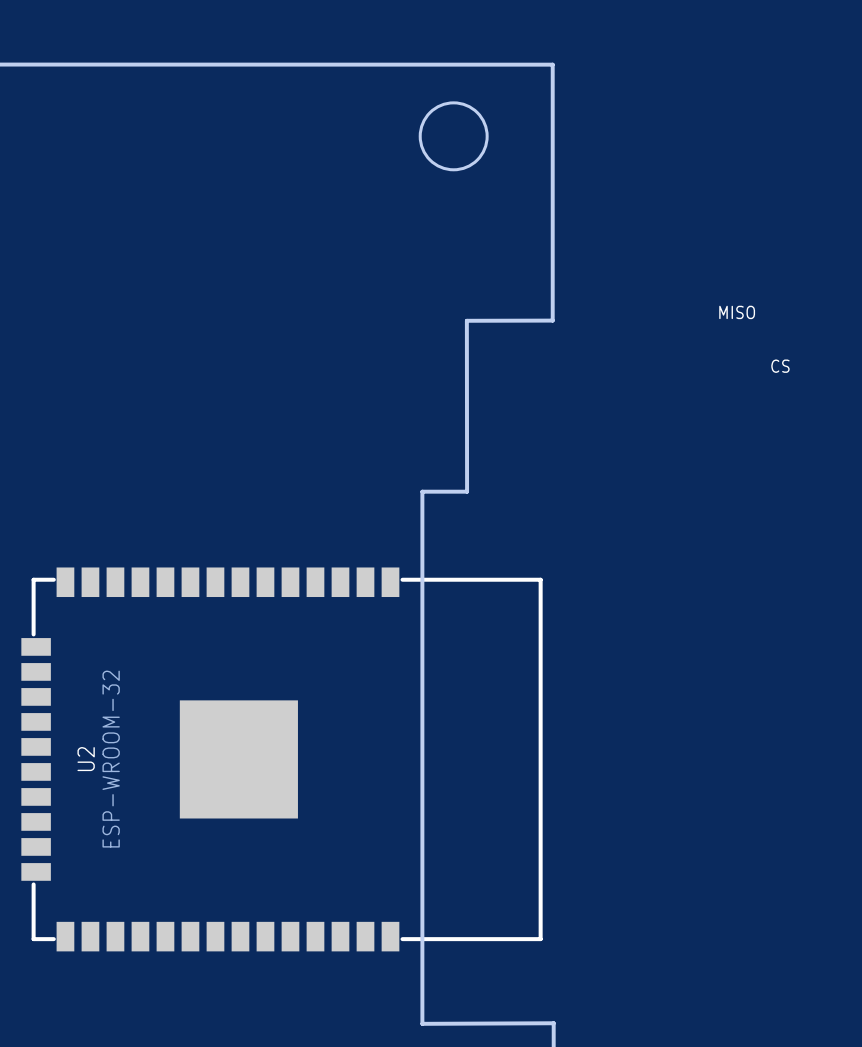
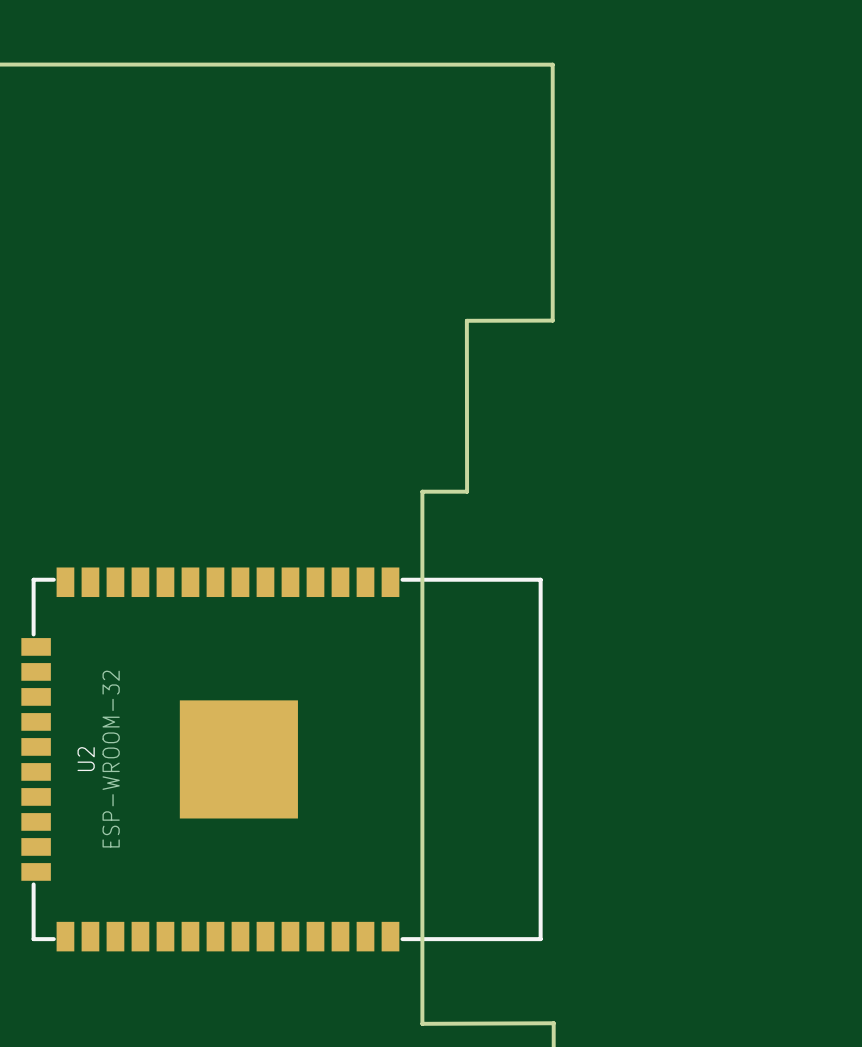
round board edge: [418, 101, 489, 172] -> none
text: MISO (737, 312) -> none
text: CS (780, 366) -> none

